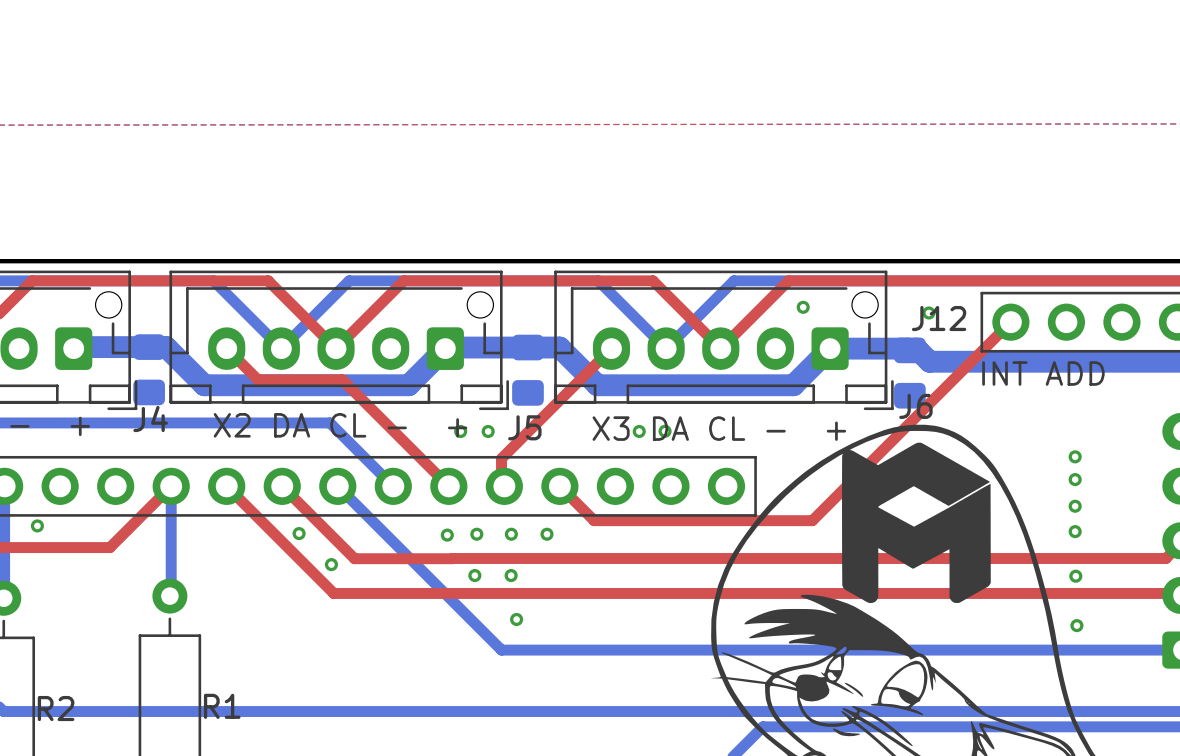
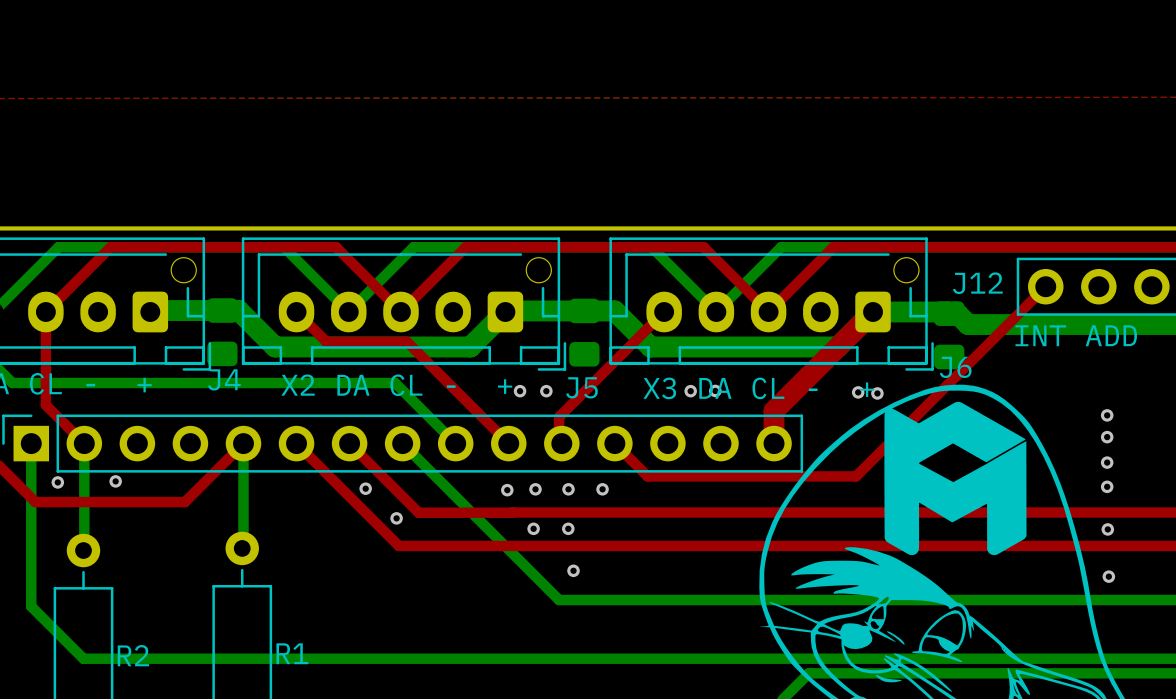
via: (803, 307) -> none
via: (928, 312) -> none
top track: none -> (873, 312) (774, 411) (774, 443)
via: none -> (858, 392)
via: none -> (877, 393)

